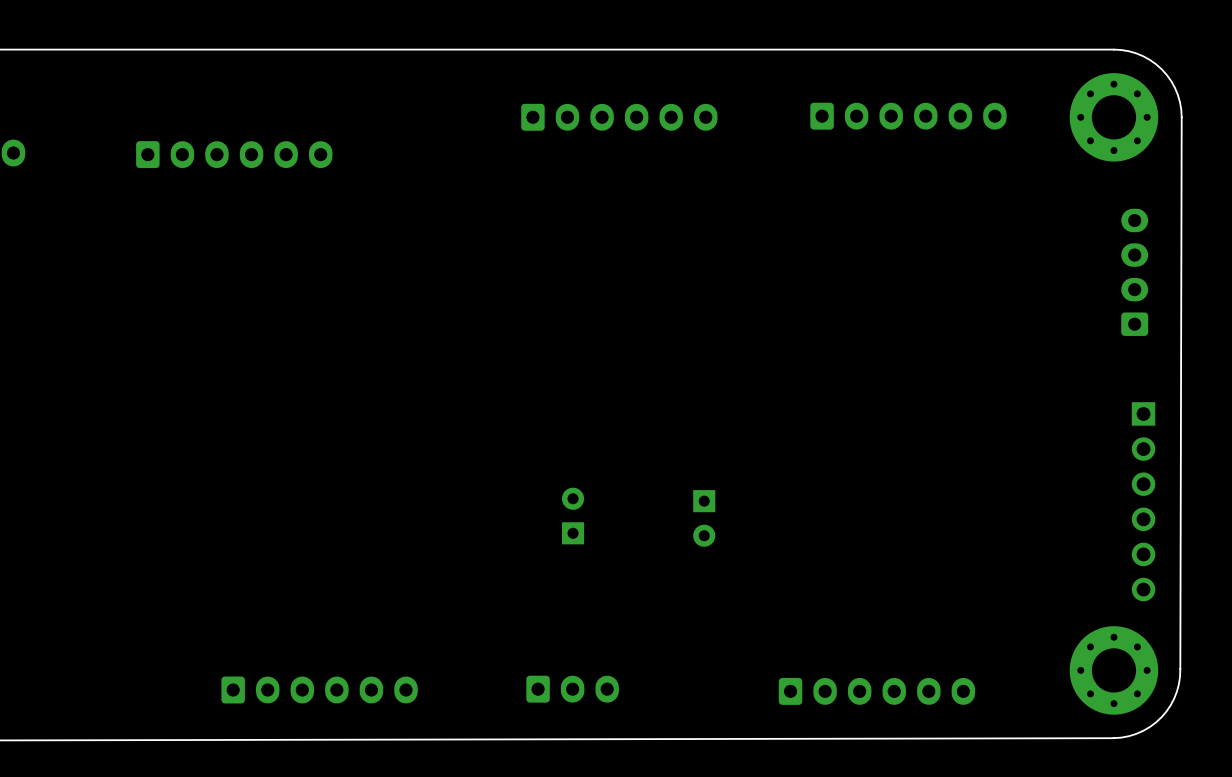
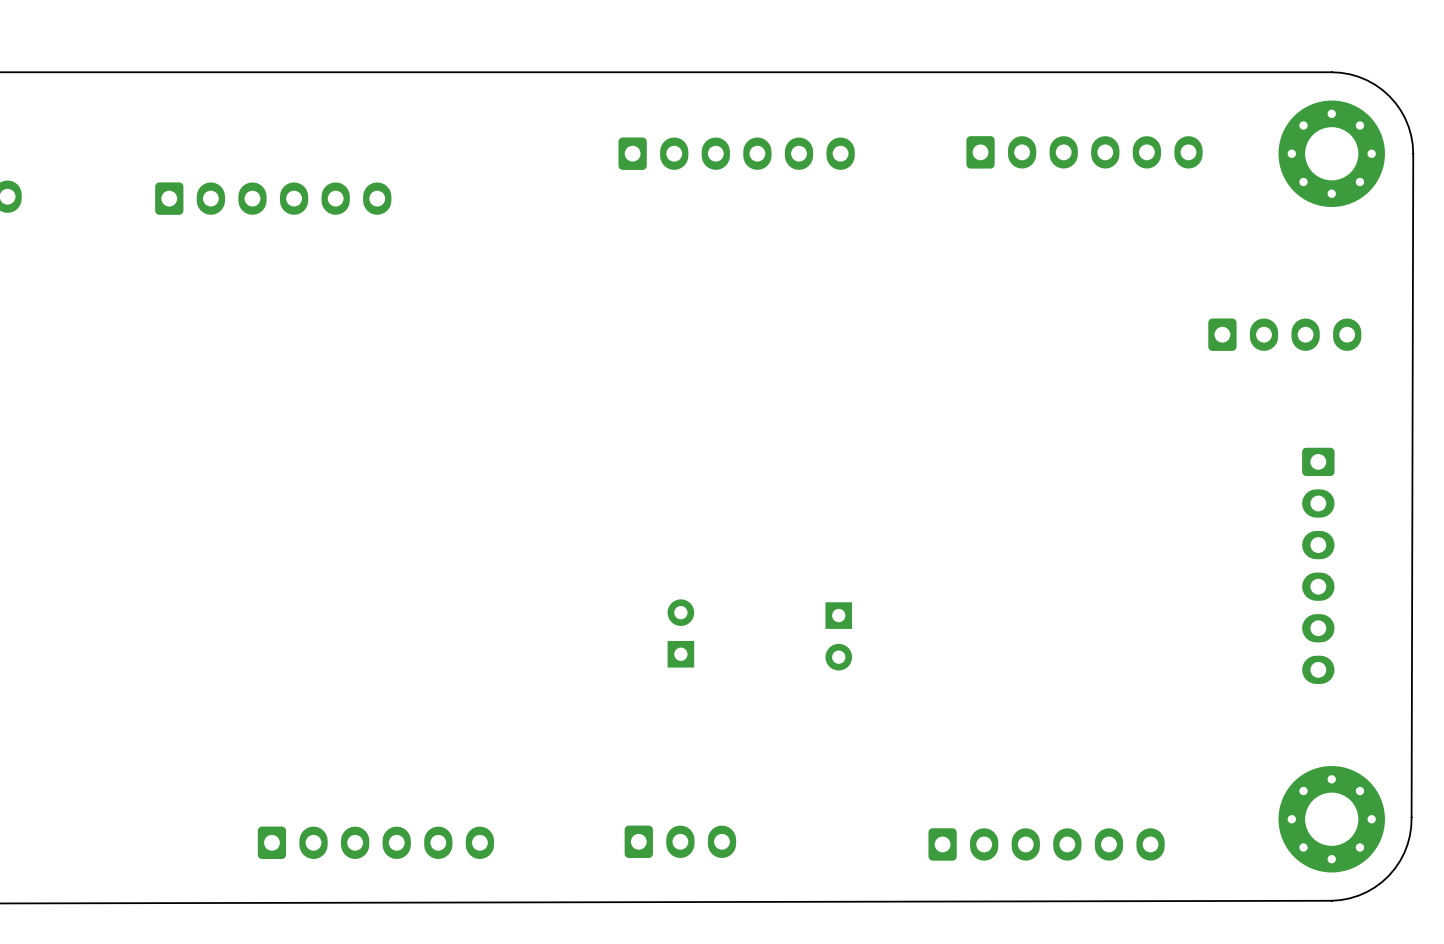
part rotation: 0° (1134, 272) -> 90° clockwise (1284, 334)
part: none -> (1318, 565)
part: (1143, 501) -> none

